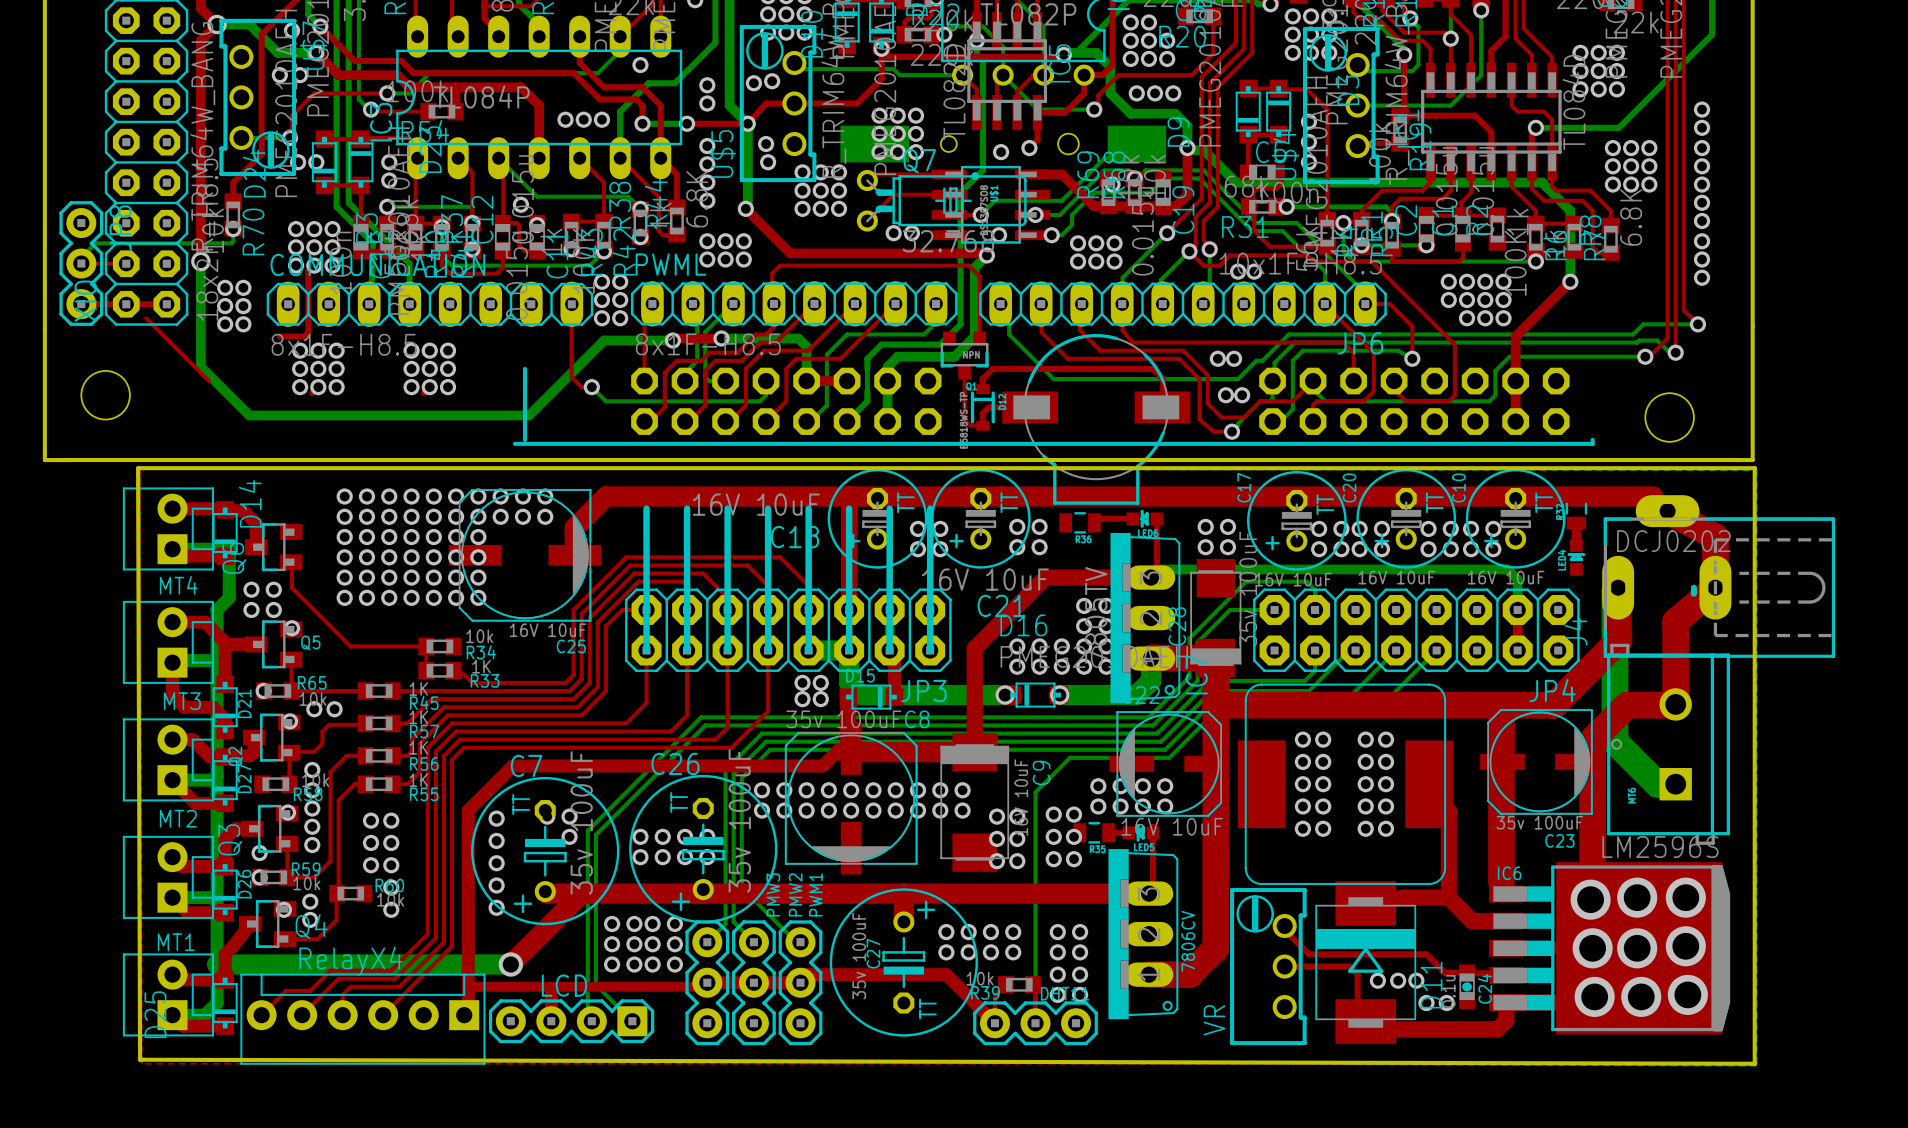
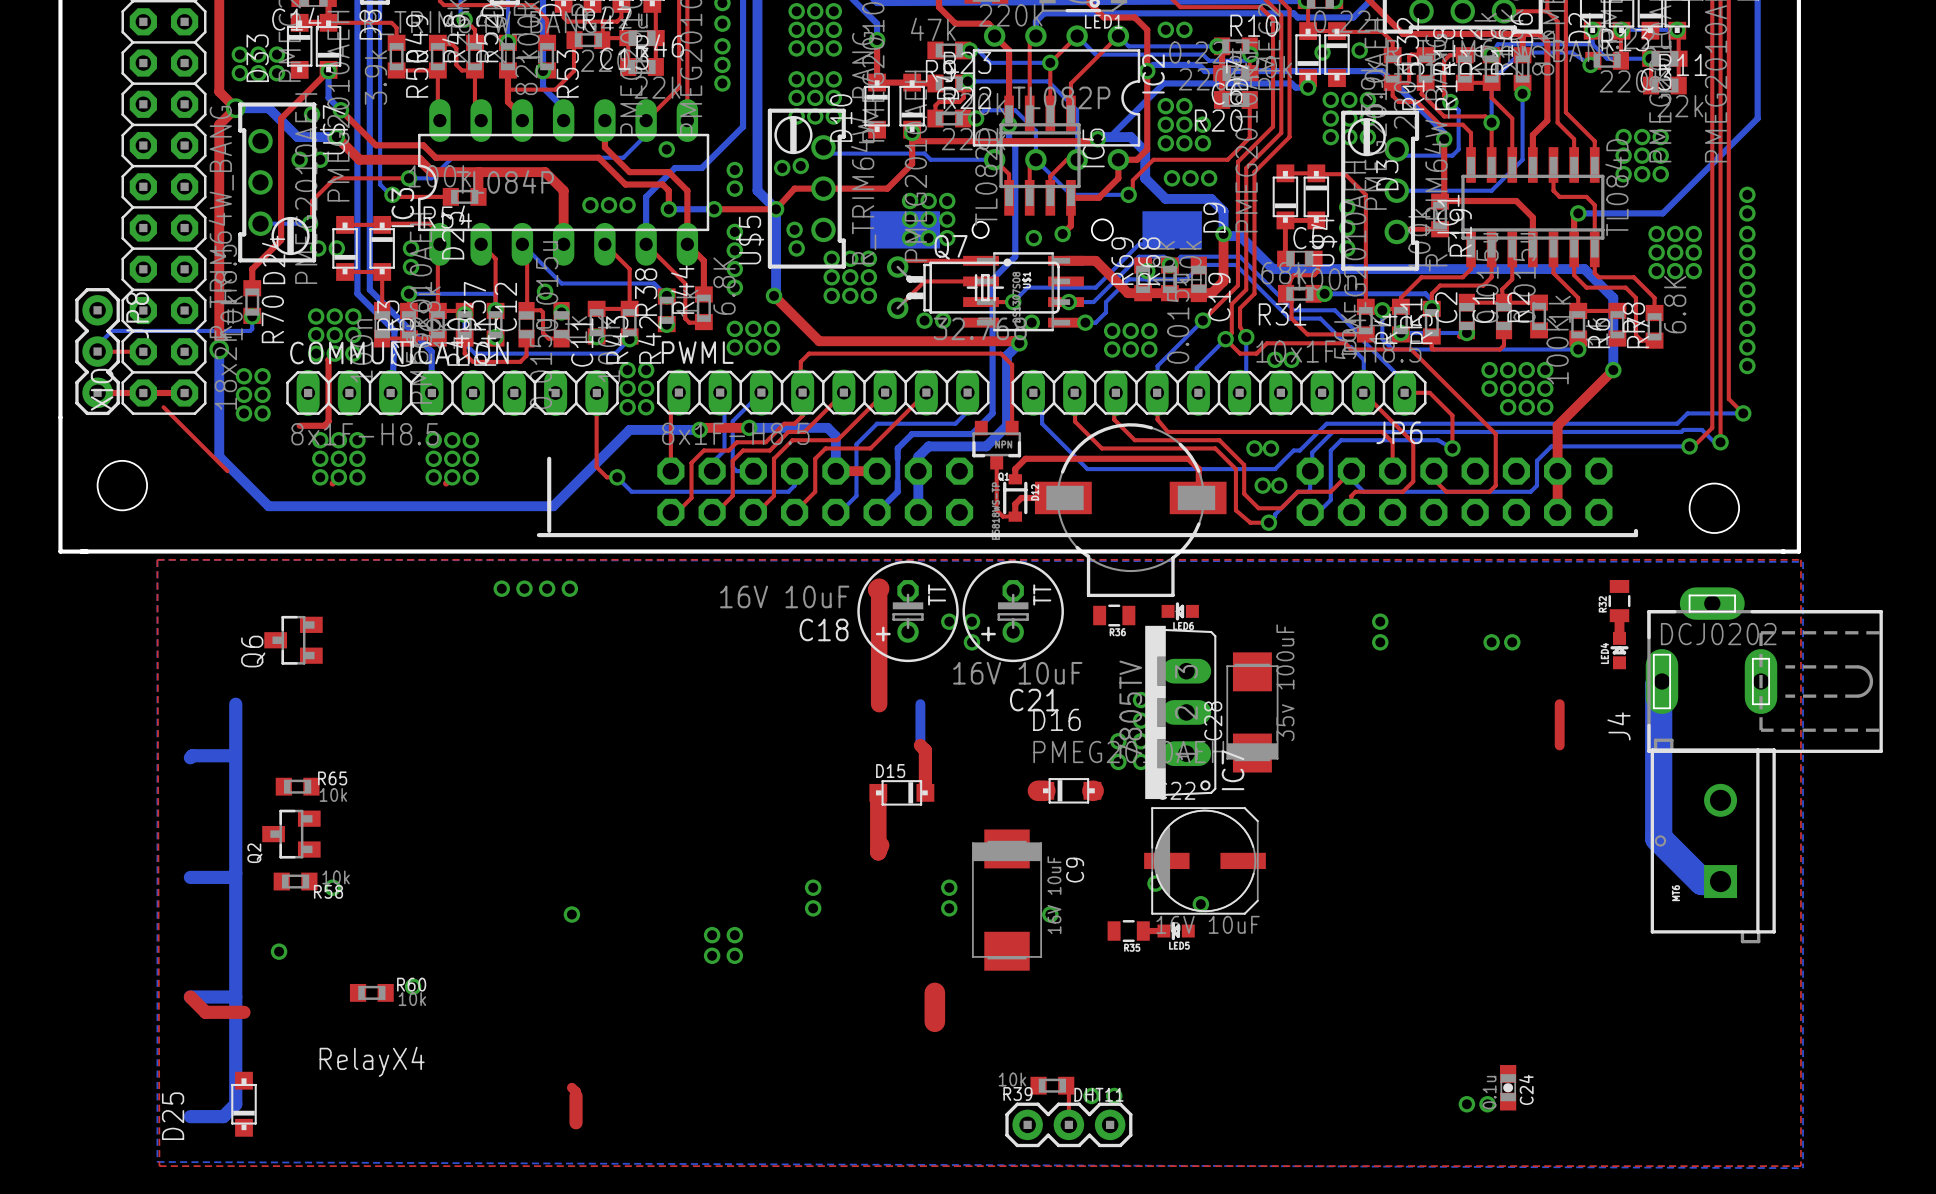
board edge: (138, 468) (1754, 468) (1754, 1063) (140, 1059) (138, 468) -> none
via: (344, 496) -> none
via: (366, 496) -> none
via: (389, 496) -> none
via: (411, 496) -> none
via: (433, 496) -> none
via: (456, 496) -> none
top track: (172, 508) (243, 510) (256, 523) (256, 547) -> none
line: (646, 508) (646, 650) -> none
line: (687, 508) (687, 650) -> none
line: (727, 508) (727, 650) -> none
line: (768, 508) (768, 650) -> none
line: (808, 508) (808, 650) -> none
line: (849, 508) (849, 650) -> none
line: (889, 508) (889, 650) -> none
line: (930, 508) (930, 650) -> none
top track: (1667, 511) (1665, 515) (1653, 496) (606, 496) (574, 527) (574, 555) -> none
top track: (1667, 511) (1715, 536) (1715, 587) (1675, 621) (1675, 704) (1627, 705) (1594, 737) (1592, 749) -> none
via: (344, 516) -> none
via: (366, 516) -> none
via: (389, 516) -> none
via: (411, 516) -> none
via: (433, 516) -> none
via: (456, 516) -> none
via: (478, 516) -> none
via: (500, 516) -> none
via: (522, 516) -> none
via: (545, 516) -> none
top track: (1132, 518) (1098, 518) (1094, 522) -> none
top track: (1156, 518) (1156, 571) (1150, 577) (1045, 577) (974, 648) (974, 752) (844, 752) (851, 748) -> none
C20: 16V 10uF (1406, 518) -> none
C10: 16V 10uF (1515, 518) -> none
C17: 16V 10uF (1296, 520) -> none
via: (1017, 526) -> none
via: (1039, 526) -> none
via: (1205, 526) -> none
via: (1227, 526) -> none
part: (168, 528) -> none
via: (1319, 528) -> none
via: (1359, 528) -> none
via: (1381, 528) -> none
via: (1428, 528) -> none
via: (1450, 528) -> none
via: (1471, 528) -> none
via: (1493, 528) -> none
D14: (225, 532) -> none
via: (344, 537) -> none
via: (366, 537) -> none
via: (389, 537) -> none
via: (411, 537) -> none
via: (433, 537) -> none
via: (456, 537) -> none
via: (478, 537) -> none
via: (1017, 547) -> none
via: (1039, 547) -> none
via: (1205, 547) -> none
via: (1227, 547) -> none
top track: (172, 549) (179, 556) (225, 556) -> none
bottom track: (172, 549) (229, 549) (229, 597) (216, 609) -> none
via: (918, 549) -> none
via: (1319, 549) -> none
via: (1359, 549) -> none
via: (1381, 549) -> none
via: (1428, 549) -> none
via: (1493, 549) -> none
C25: 16V 10uF (524, 555) -> none
via: (344, 557) -> none
via: (366, 557) -> none
via: (389, 557) -> none
via: (411, 557) -> none
via: (433, 557) -> none
via: (456, 557) -> none
via: (478, 557) -> none
top track: (291, 562) (292, 587) (350, 646) (426, 646) (426, 670) (421, 665) -> none
via: (344, 577) -> none
via: (366, 577) -> none
via: (389, 577) -> none
via: (411, 577) -> none
via: (433, 577) -> none
via: (456, 577) -> none
via: (478, 577) -> none
bottom track: (1150, 577) (1159, 569) (1507, 569) (1517, 579) (1517, 609) -> none
text: MT4 (178, 585) -> none
top track: (1618, 587) (1618, 640) (1554, 705) (1215, 705) (1215, 754) (1206, 763) -> none
line: (1693, 587) (1693, 593) -> none
via: (251, 589) -> none
via: (273, 589) -> none
via: (344, 597) -> none
via: (366, 597) -> none
via: (389, 597) -> none
via: (411, 597) -> none
via: (433, 597) -> none
via: (456, 597) -> none
via: (478, 597) -> none
via: (1084, 605) -> none
via: (251, 609) -> none
via: (273, 609) -> none
top track: (646, 609) (622, 609) (606, 626) (606, 691) (581, 715) (448, 715) (419, 743) (419, 772) (407, 784) (392, 784) -> none
top track: (687, 609) (687, 585) (683, 581) (638, 581) (597, 622) (597, 686) (577, 707) (443, 707) (411, 739) (411, 751) (407, 755) (392, 755) -> none
top track: (727, 609) (727, 597) (703, 573) (634, 573) (589, 618) (589, 682) (573, 699) (431, 699) (407, 723) (392, 723) -> none
top track: (768, 609) (768, 585) (747, 565) (630, 565) (581, 614) (581, 678) (569, 691) (392, 691) -> none
top track: (808, 609) (808, 585) (780, 557) (626, 557) (573, 609) (573, 674) (565, 682) (472, 682) (464, 674) (453, 670) -> none
bottom track: (1274, 609) (1230, 609) (1197, 642) (1197, 680) (1153, 725) (705, 725) (595, 834) (595, 984) (632, 1021) -> none
bottom track: (1315, 609) (1315, 589) (1306, 581) (1246, 581) (1189, 638) (1189, 676) (1148, 717) (701, 717) (587, 830) (587, 1017) (591, 1021) -> none
top track: (172, 622) (204, 622) (227, 644) (256, 644) -> none
via: (1084, 626) -> none
via: (292, 628) -> none
JP3: (788, 630) -> none
JP4: (1416, 630) -> none
part: (168, 642) -> none
top track: (225, 642) (225, 684) -> none
Q5: (273, 644) -> none
R34: 10k (439, 646) -> none
via: (1017, 646) -> none
via: (1039, 646) -> none
via: (1061, 646) -> none
top track: (646, 650) (646, 703) (626, 723) (452, 723) (427, 747) (427, 934) (391, 970) (330, 970) (310, 990) (285, 990) (261, 1015) -> none
top track: (687, 650) (687, 715) (670, 731) (456, 731) (435, 751) (435, 938) (395, 978) (338, 978) (302, 1015) -> none
top track: (727, 650) (727, 727) (715, 739) (460, 739) (443, 755) (443, 942) (399, 986) (350, 986) (342, 994) (342, 1015) -> none
top track: (768, 650) (768, 711) (731, 747) (464, 747) (452, 759) (452, 946) (383, 1015) -> none
bottom track: (808, 650) (849, 650) (849, 682) (861, 695) (1005, 695) -> none
bottom track: (1315, 650) (1315, 670) (1304, 680) (1209, 680) (1157, 733) (762, 733) (725, 770) (725, 923) (707, 942) -> none
bottom track: (1355, 650) (1349, 650) (1309, 691) (1211, 691) (1161, 741) (766, 741) (733, 774) (733, 921) (753, 942) -> none
bottom track: (1396, 650) (1347, 699) (1215, 699) (1165, 749) (770, 749) (741, 778) (741, 887) (792, 938) (796, 938) (800, 942) -> none
bottom track: (1436, 650) (1379, 707) (1219, 707) (1169, 757) (1069, 757) (1035, 792) (1035, 1023) -> none
top track: (1150, 658) (1215, 657) (1215, 948) (1189, 974) (1148, 974) -> none
bottom track: (1150, 658) (1150, 680) (1136, 695) (1059, 695) -> none
top track: (291, 659) (291, 691) (365, 691) -> none
top track: (172, 662) (172, 695) (184, 707) (213, 707) (225, 719) (225, 730) -> none
via: (1017, 666) -> none
via: (1039, 666) -> none
via: (1061, 666) -> none
R33: 1K (439, 670) -> none
via: (802, 682) -> none
via: (820, 682) -> none
via: (263, 691) -> none
R45: 1K (379, 691) -> none
via: (1005, 695) -> none
via: (1059, 695) -> none
via: (802, 699) -> none
via: (820, 699) -> none
text: MT3 (182, 701) -> none
top track: (1503, 705) (1501, 707) (1501, 881) (1507, 892) (1506, 894) -> none
D21: (225, 707) -> none
via: (314, 709) -> none
via: (334, 709) -> none
via: (289, 721) -> none
top track: (365, 723) (329, 724) (322, 731) (322, 743) (314, 751) (289, 752) -> none
R57: 1K (379, 723) -> none
top track: (254, 737) (254, 752) (249, 755) (225, 757) (210, 757) (192, 739) (172, 739) -> none
via: (1302, 739) -> none
via: (1323, 739) -> none
via: (1365, 739) -> none
via: (1385, 739) -> none
top track: (851, 748) (839, 749) (822, 765) (512, 765) (468, 810) (468, 1011) (464, 1015) -> none
top track: (1592, 749) (1592, 915) -> none
top track: (289, 752) (289, 784) -> none
top track: (365, 755) (346, 755) (330, 772) (330, 861) (314, 877) (287, 876) -> none
R56: 1K (379, 755) -> none
part: (168, 759) -> none
via: (1302, 761) -> none
via: (1323, 761) -> none
via: (1365, 761) -> none
via: (1385, 761) -> none
C23: 35v 100uF (1539, 761) -> none
via: (312, 770) -> none
top track: (172, 780) (195, 803) (225, 803) -> none
D27: (225, 780) -> none
top track: (365, 784) (354, 784) (338, 800) (336, 919) (317, 939) (285, 939) -> none
R55: 1K (379, 784) -> none
via: (1302, 784) -> none
via: (1323, 784) -> none
part: (1345, 784) -> none
via: (1365, 784) -> none
via: (1385, 784) -> none
top track: (1429, 784) (1448, 811) (1448, 897) -> none
via: (1098, 786) -> none
via: (1142, 786) -> none
via: (1165, 786) -> none
via: (762, 790) -> none
via: (806, 790) -> none
via: (828, 790) -> none
via: (851, 790) -> none
via: (873, 790) -> none
via: (895, 790) -> none
via: (940, 790) -> none
via: (962, 790) -> none
C8: 35v 100uF (851, 798) -> none
via: (1098, 806) -> none
via: (1120, 806) -> none
via: (1142, 806) -> none
via: (1302, 806) -> none
via: (1323, 806) -> none
via: (1365, 806) -> none
via: (1385, 806) -> none
via: (312, 808) -> none
via: (762, 810) -> none
via: (806, 810) -> none
via: (828, 810) -> none
via: (851, 810) -> none
via: (873, 810) -> none
via: (895, 810) -> none
via: (940, 810) -> none
via: (962, 810) -> none
via: (287, 812) -> none
via: (1053, 814) -> none
via: (1074, 814) -> none
via: (569, 816) -> none
via: (997, 816) -> none
text: MT2 (178, 818) -> none
via: (496, 818) -> none
via: (371, 820) -> none
via: (391, 820) -> none
via: (312, 826) -> none
top track: (252, 828) (235, 828) (225, 838) (225, 866) (181, 866) (172, 857) -> none
Q3: (269, 828) -> none
via: (1302, 828) -> none
via: (1323, 828) -> none
via: (1365, 828) -> none
via: (1385, 828) -> none
top track: (1152, 832) (1153, 826) (1153, 889) (1148, 893) (547, 893) (545, 891) -> none
via: (569, 836) -> none
via: (640, 836) -> none
via: (662, 836) -> none
via: (1053, 836) -> none
via: (1074, 836) -> none
via: (997, 838) -> none
via: (1017, 838) -> none
via: (496, 840) -> none
via: (371, 842) -> none
via: (391, 842) -> none
top track: (287, 843) (287, 876) -> none
via: (312, 844) -> none
C26: 35v 100uF (703, 849) -> none
C7: 35v 100uF (545, 851) -> none
via: (640, 857) -> none
via: (662, 857) -> none
via: (1053, 859) -> none
via: (1074, 859) -> none
via: (997, 861) -> none
via: (1017, 861) -> none
via: (496, 863) -> none
via: (371, 865) -> none
via: (391, 865) -> none
part: (168, 877) -> none
via: (259, 877) -> none
R59: 10k (273, 877) -> none
via: (496, 885) -> none
D26: (225, 889) -> none
top track: (581, 893) (510, 964) (510, 962) -> none
top track: (1448, 897) (1472, 921) (1506, 921) -> none
top track: (1448, 897) (1404, 897) (1365, 903) -> none
via: (1637, 897) -> none
via: (1685, 897) -> none
via: (1590, 899) -> none
via: (310, 901) -> none
via: (496, 907) -> none
via: (283, 909) -> none
via: (391, 909) -> none
via: (310, 919) -> none
top track: (250, 923) (225, 954) (225, 979) (177, 979) (172, 974) -> none
Q4: (267, 923) -> none
via: (612, 923) -> none
via: (634, 923) -> none
via: (652, 923) -> none
via: (674, 923) -> none
top track: (1284, 926) (1284, 930) (1309, 954) (1426, 954) (1444, 972) (1504, 973) (1506, 975) -> none
via: (946, 932) -> none
via: (968, 932) -> none
via: (990, 932) -> none
via: (1013, 932) -> none
via: (1057, 932) -> none
via: (1080, 932) -> none
7806CV: (1143, 934) -> none
text: MT1 (176, 942) -> none
via: (612, 944) -> none
via: (634, 944) -> none
via: (652, 944) -> none
via: (674, 944) -> none
via: (1685, 946) -> none
via: (1592, 948) -> none
IC6: LM2596S (1609, 948) -> none
via: (1637, 948) -> none
via: (946, 952) -> none
via: (968, 952) -> none
via: (990, 952) -> none
via: (1013, 952) -> none
via: (1057, 952) -> none
via: (1080, 952) -> none
C27: 35v 100uF (903, 962) -> none
D11: (1365, 962) -> none
bottom track: (217, 964) (510, 964) -> none
via: (510, 964) -> none
via: (612, 964) -> none
via: (634, 964) -> none
via: (652, 964) -> none
via: (674, 964) -> none
VR: (1268, 966) -> none
top track: (1284, 966) (1349, 966) (1357, 974) (1357, 1015) -> none
via: (1057, 974) -> none
via: (1080, 974) -> none
via: (1377, 980) -> none
via: (1398, 980) -> none
via: (1416, 980) -> none
PMW3: (707, 982) -> none
PMW2: (753, 982) -> none
PWM1: (800, 982) -> none
top track: (1005, 984) (995, 995) (995, 1023) (946, 974) (806, 974) (800, 982) (707, 982) (703, 986) (468, 986) -> none
part: (168, 994) -> none
via: (1687, 994) -> none
via: (1594, 996) -> none
via: (1641, 996) -> none
top track: (1612, 998) (1609, 1002) (1506, 1002) (1506, 1020) (1497, 1029) (1379, 1029) (1357, 1015) -> none
top track: (172, 1015) (183, 1026) (225, 1026) -> none
part: (362, 1019) -> none
LCD: (571, 1021) -> none

